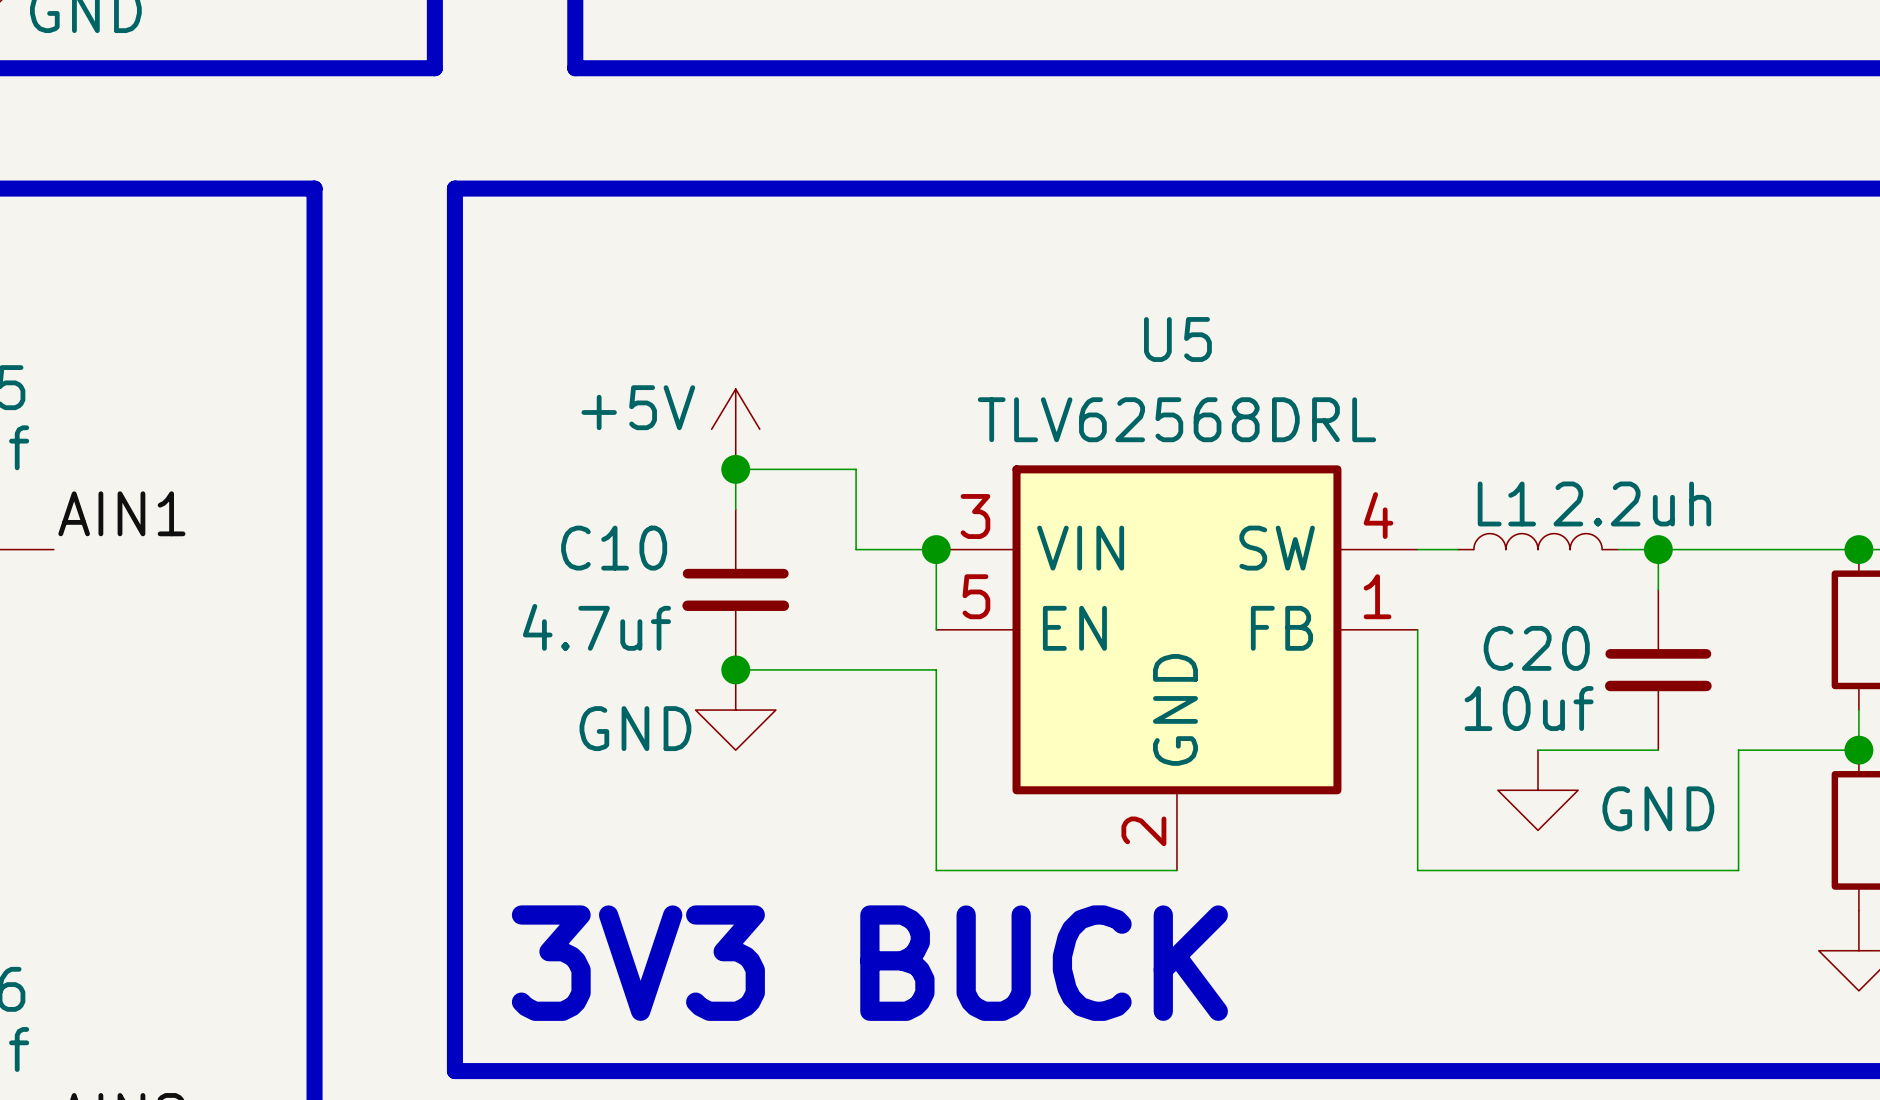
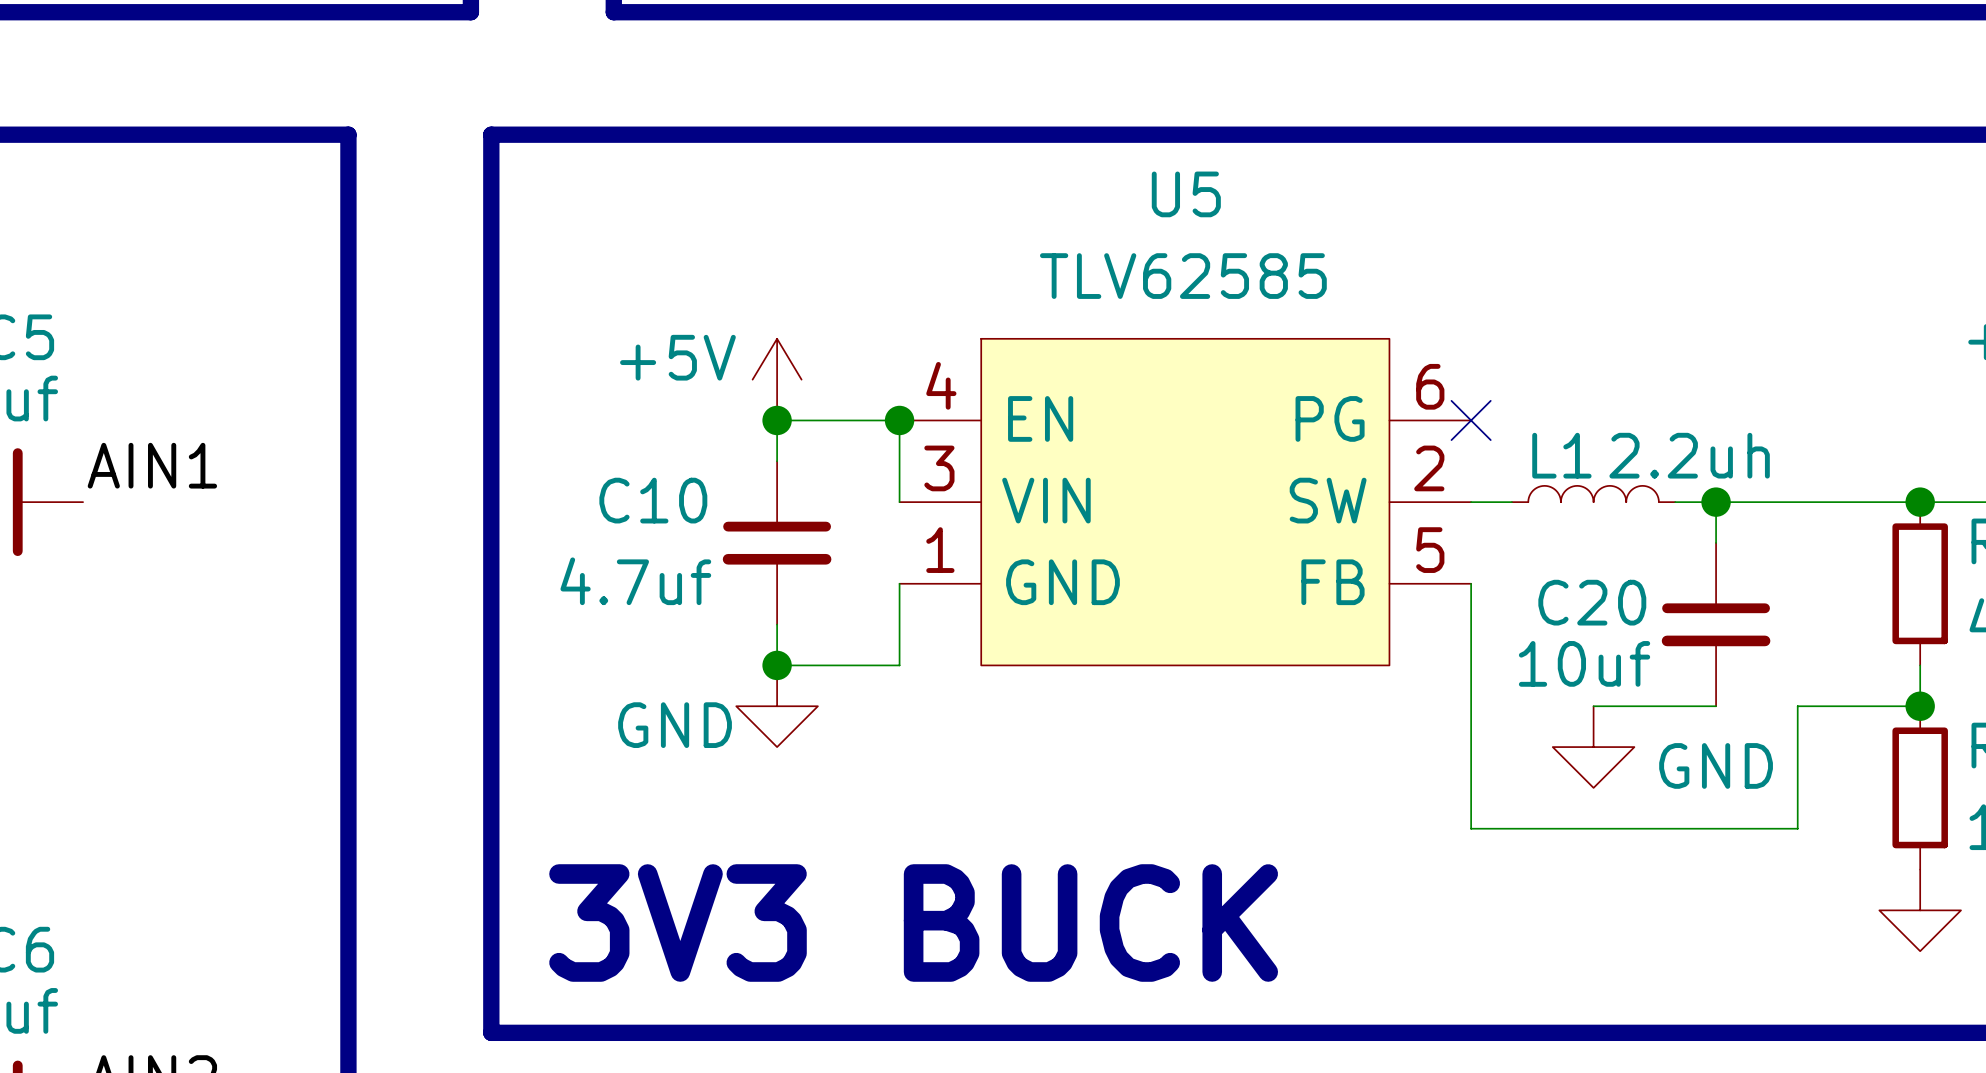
U5 value: TLV62568DRL (1176, 419) -> TLV62585 (1183, 276)
U5 symbol: [936, 465, 1418, 871] -> [899, 338, 1472, 666]
no-connect mark: none -> (1471, 420)
junction position: (936, 549) -> (899, 420)
wire: (735, 669) (936, 669) (936, 870) (1176, 870) -> (777, 624) (777, 665) (899, 665) (899, 583)
junction position: (735, 669) -> (777, 665)
power symbol position: GND (735, 710) -> GND (777, 706)

